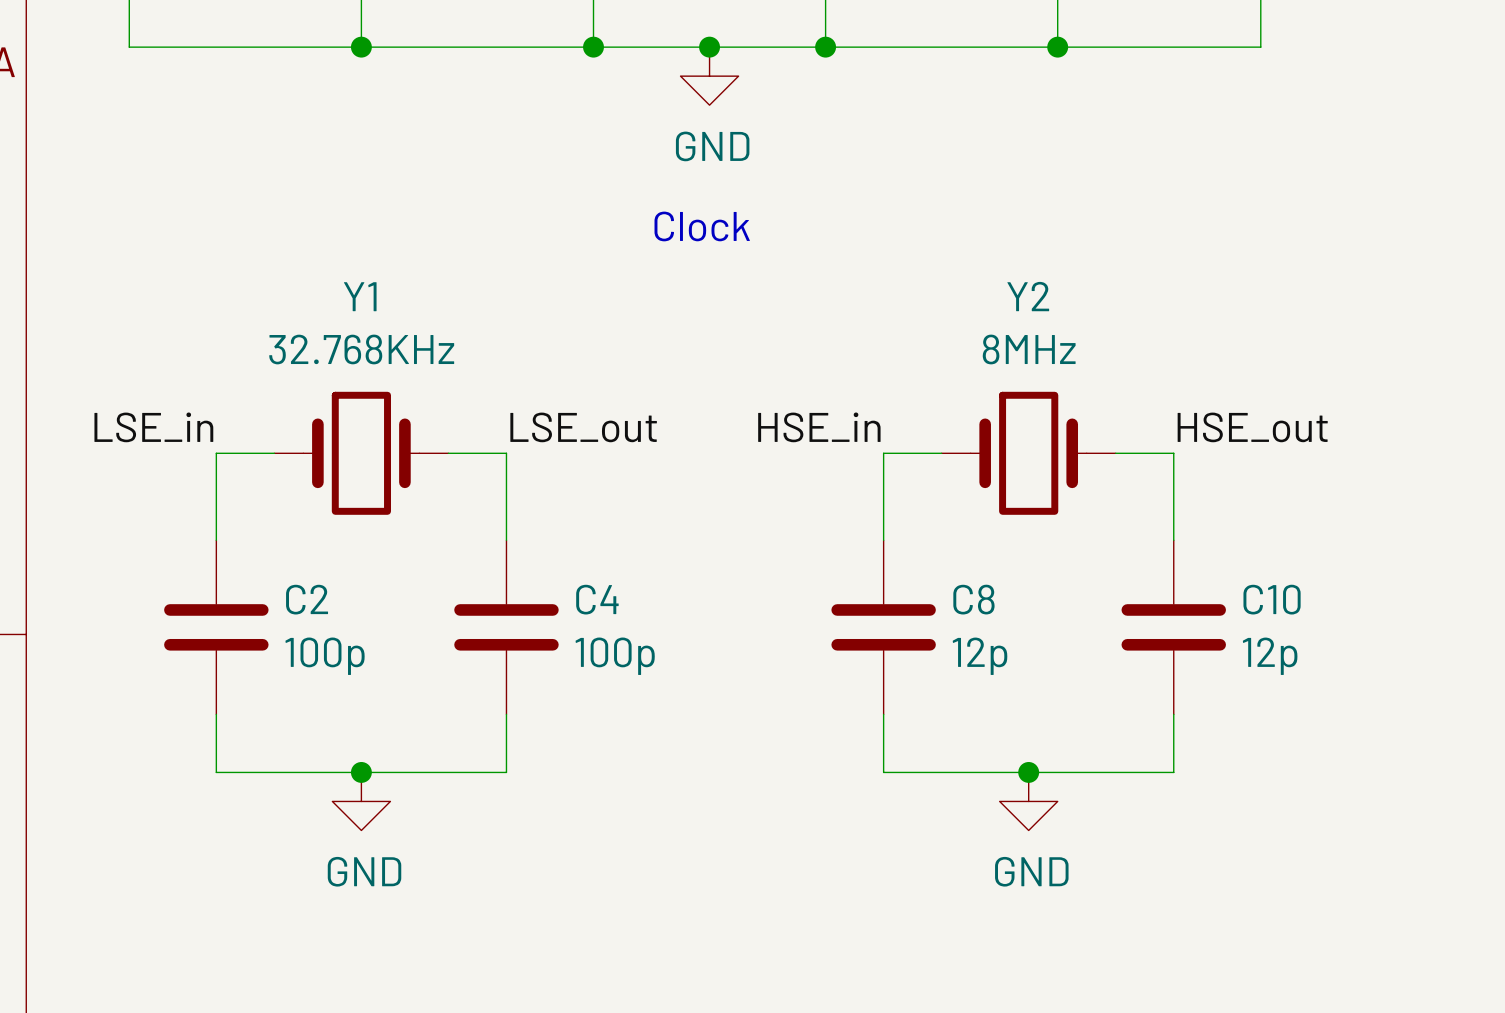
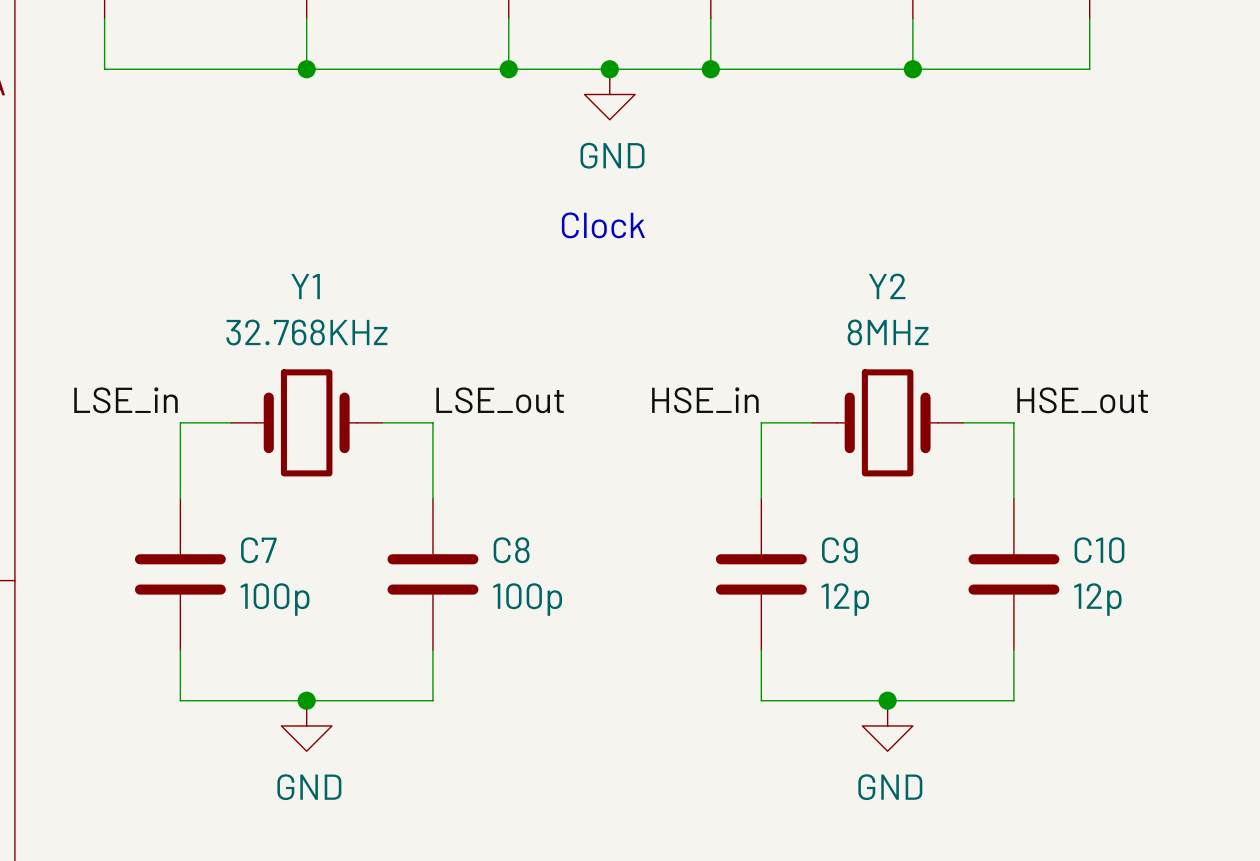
C2 name: C2 (307, 599) -> C7 (258, 550)
C4 name: C4 (597, 599) -> C8 (511, 550)
C8 name: C8 (973, 599) -> C9 (839, 550)

